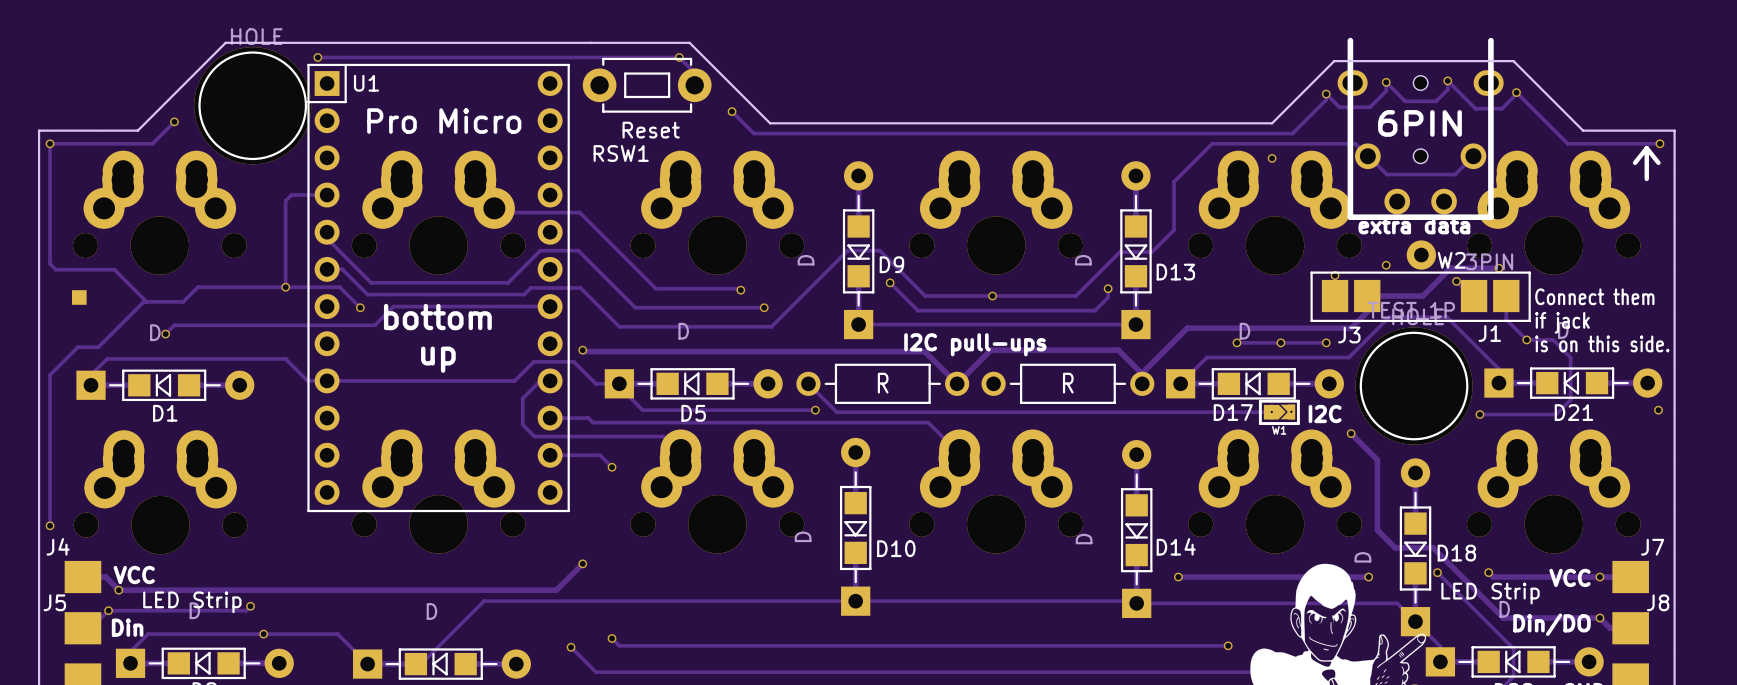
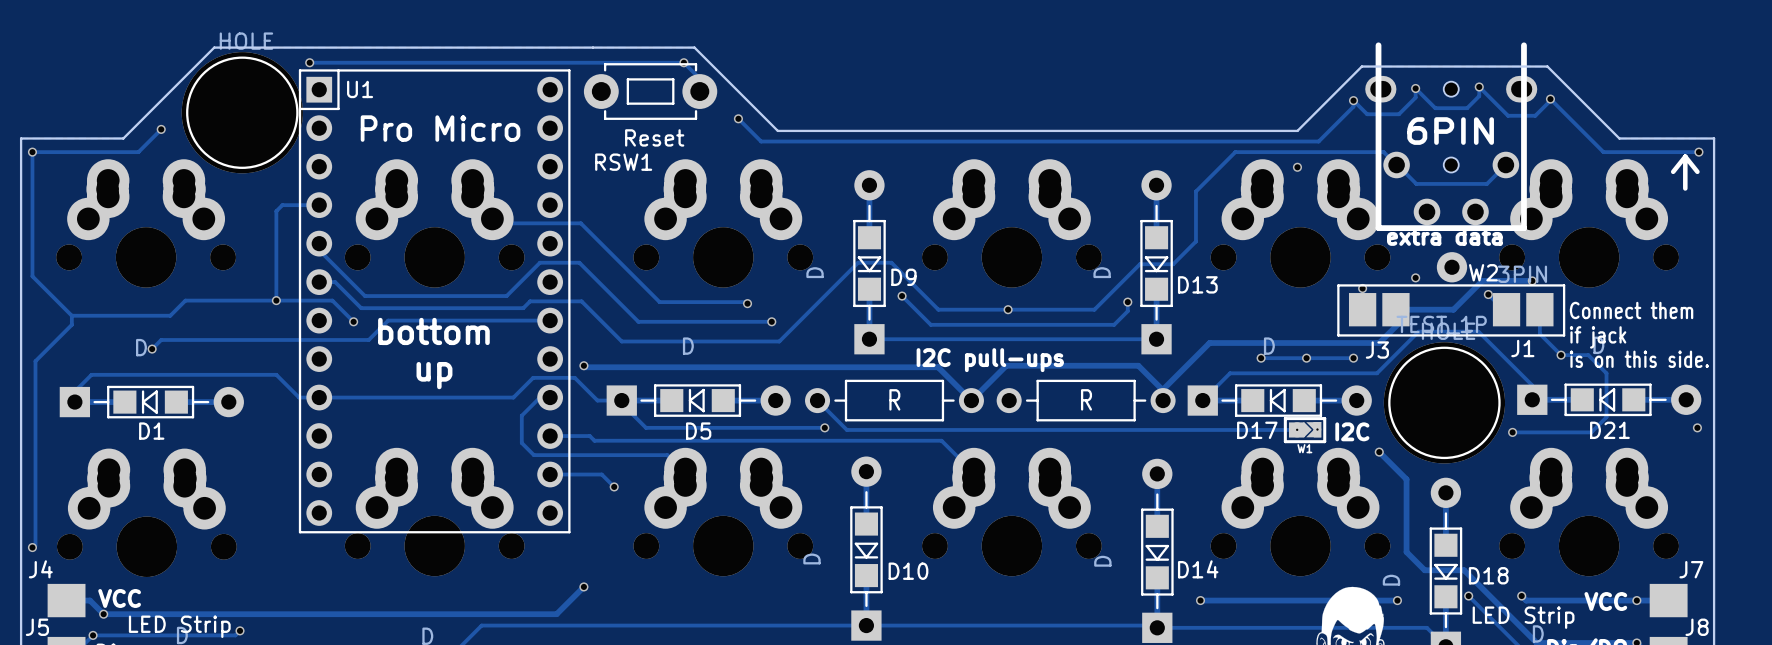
track: (55, 269) (114, 269) (146, 301) -> (38, 282) (71, 315)
part: (79, 297) -> none
track: none -> (71, 315) (71, 324) (35, 361) (35, 546)
track: (143, 301) (98, 347) (77, 347) (50, 375) (50, 525) -> (129, 315) (71, 315)

